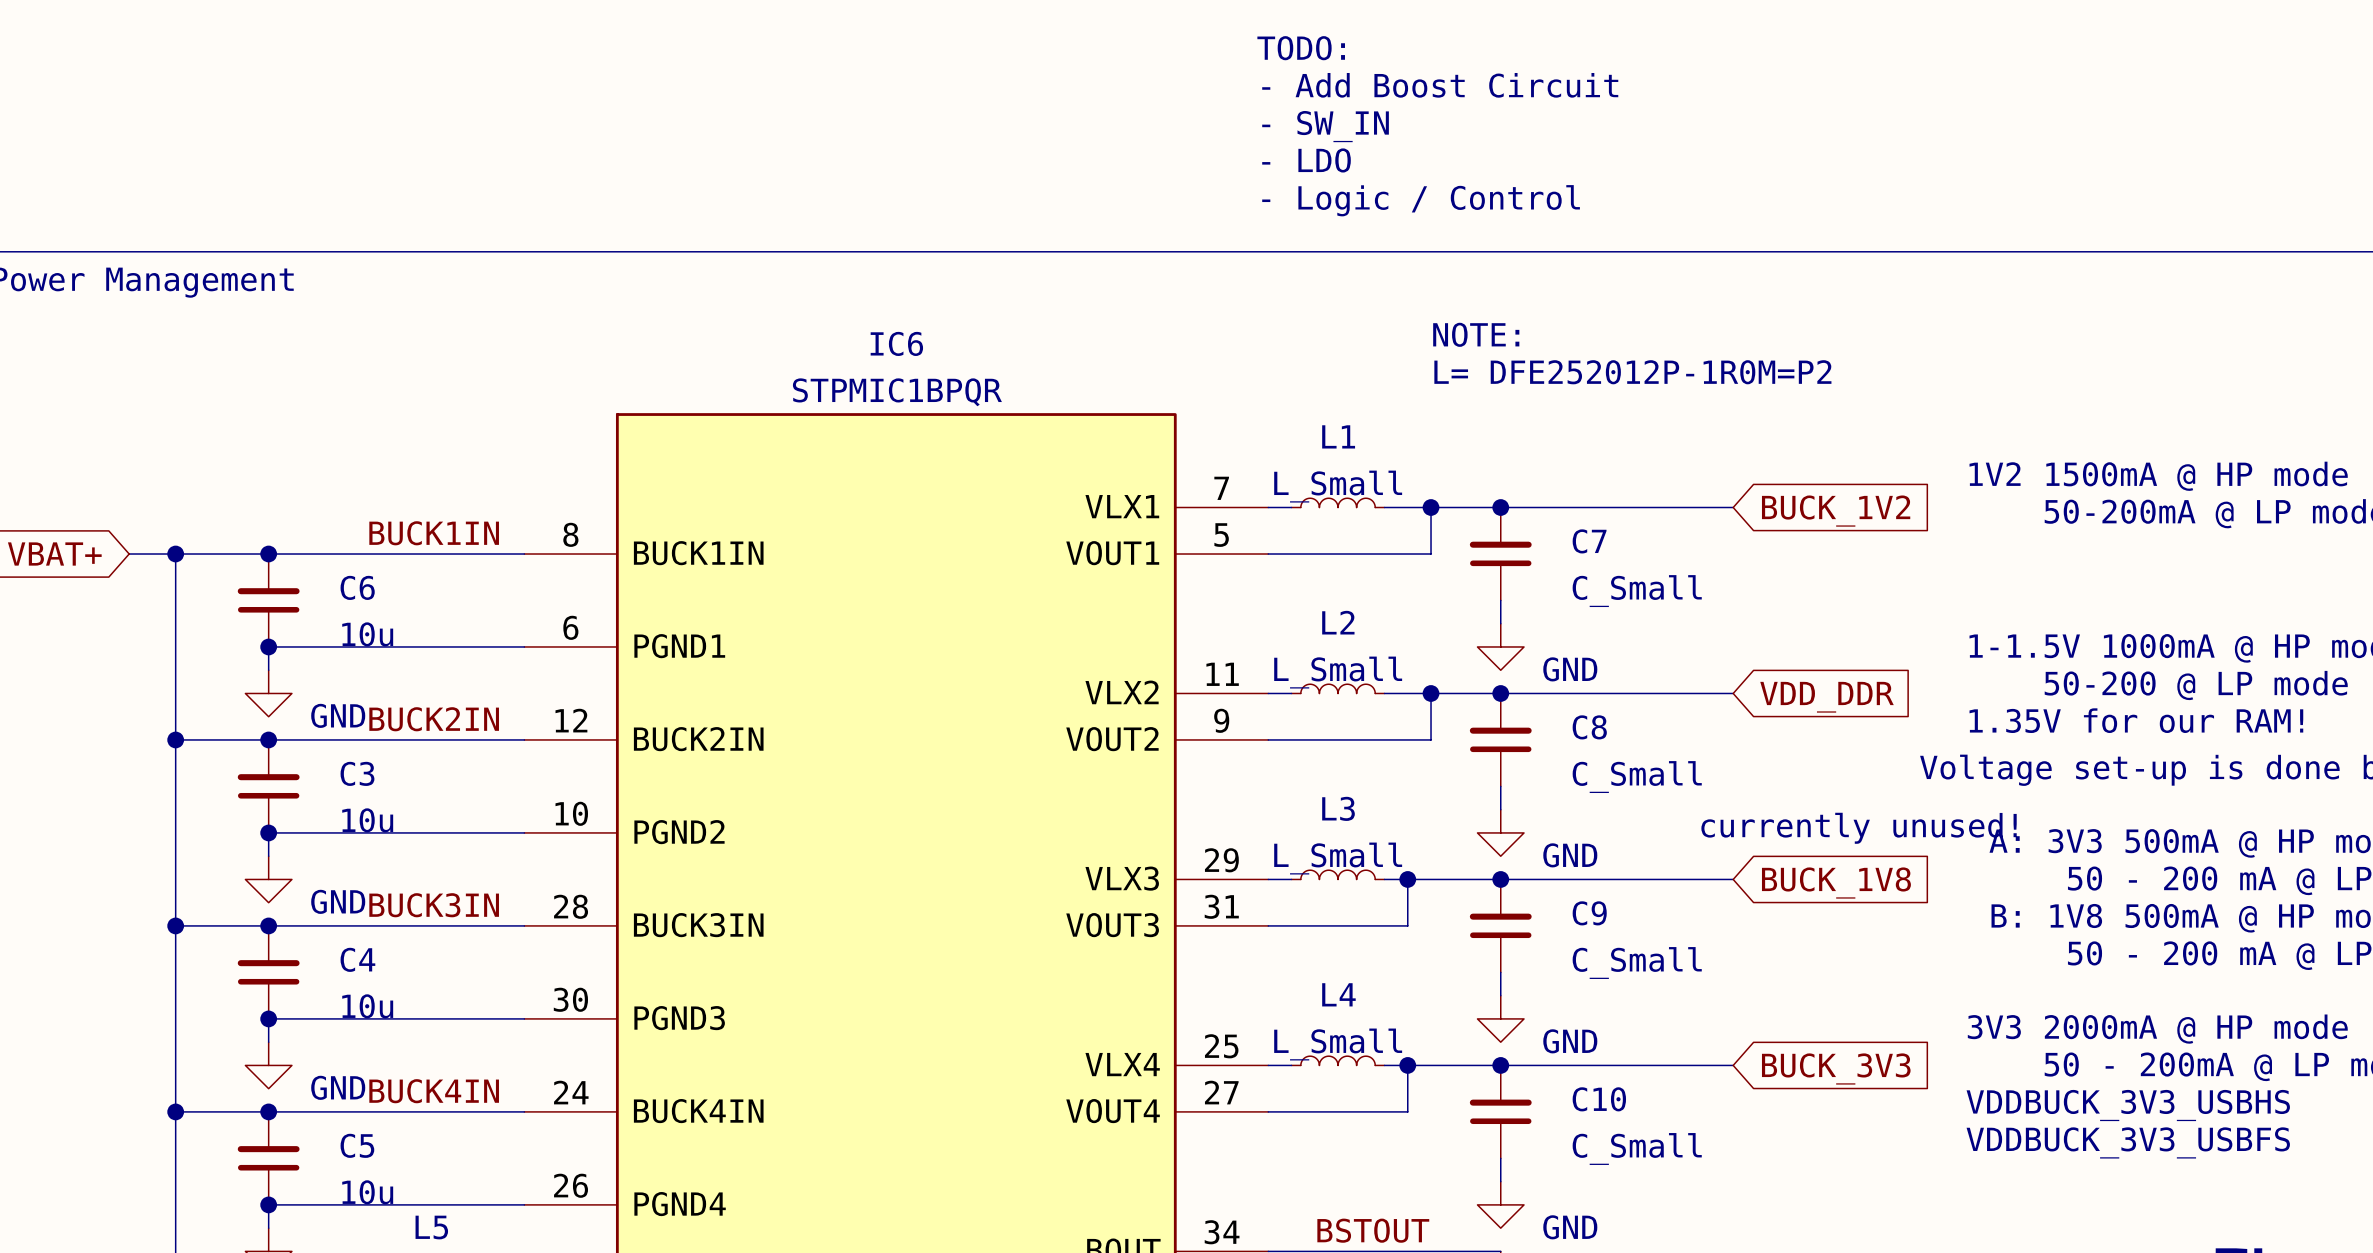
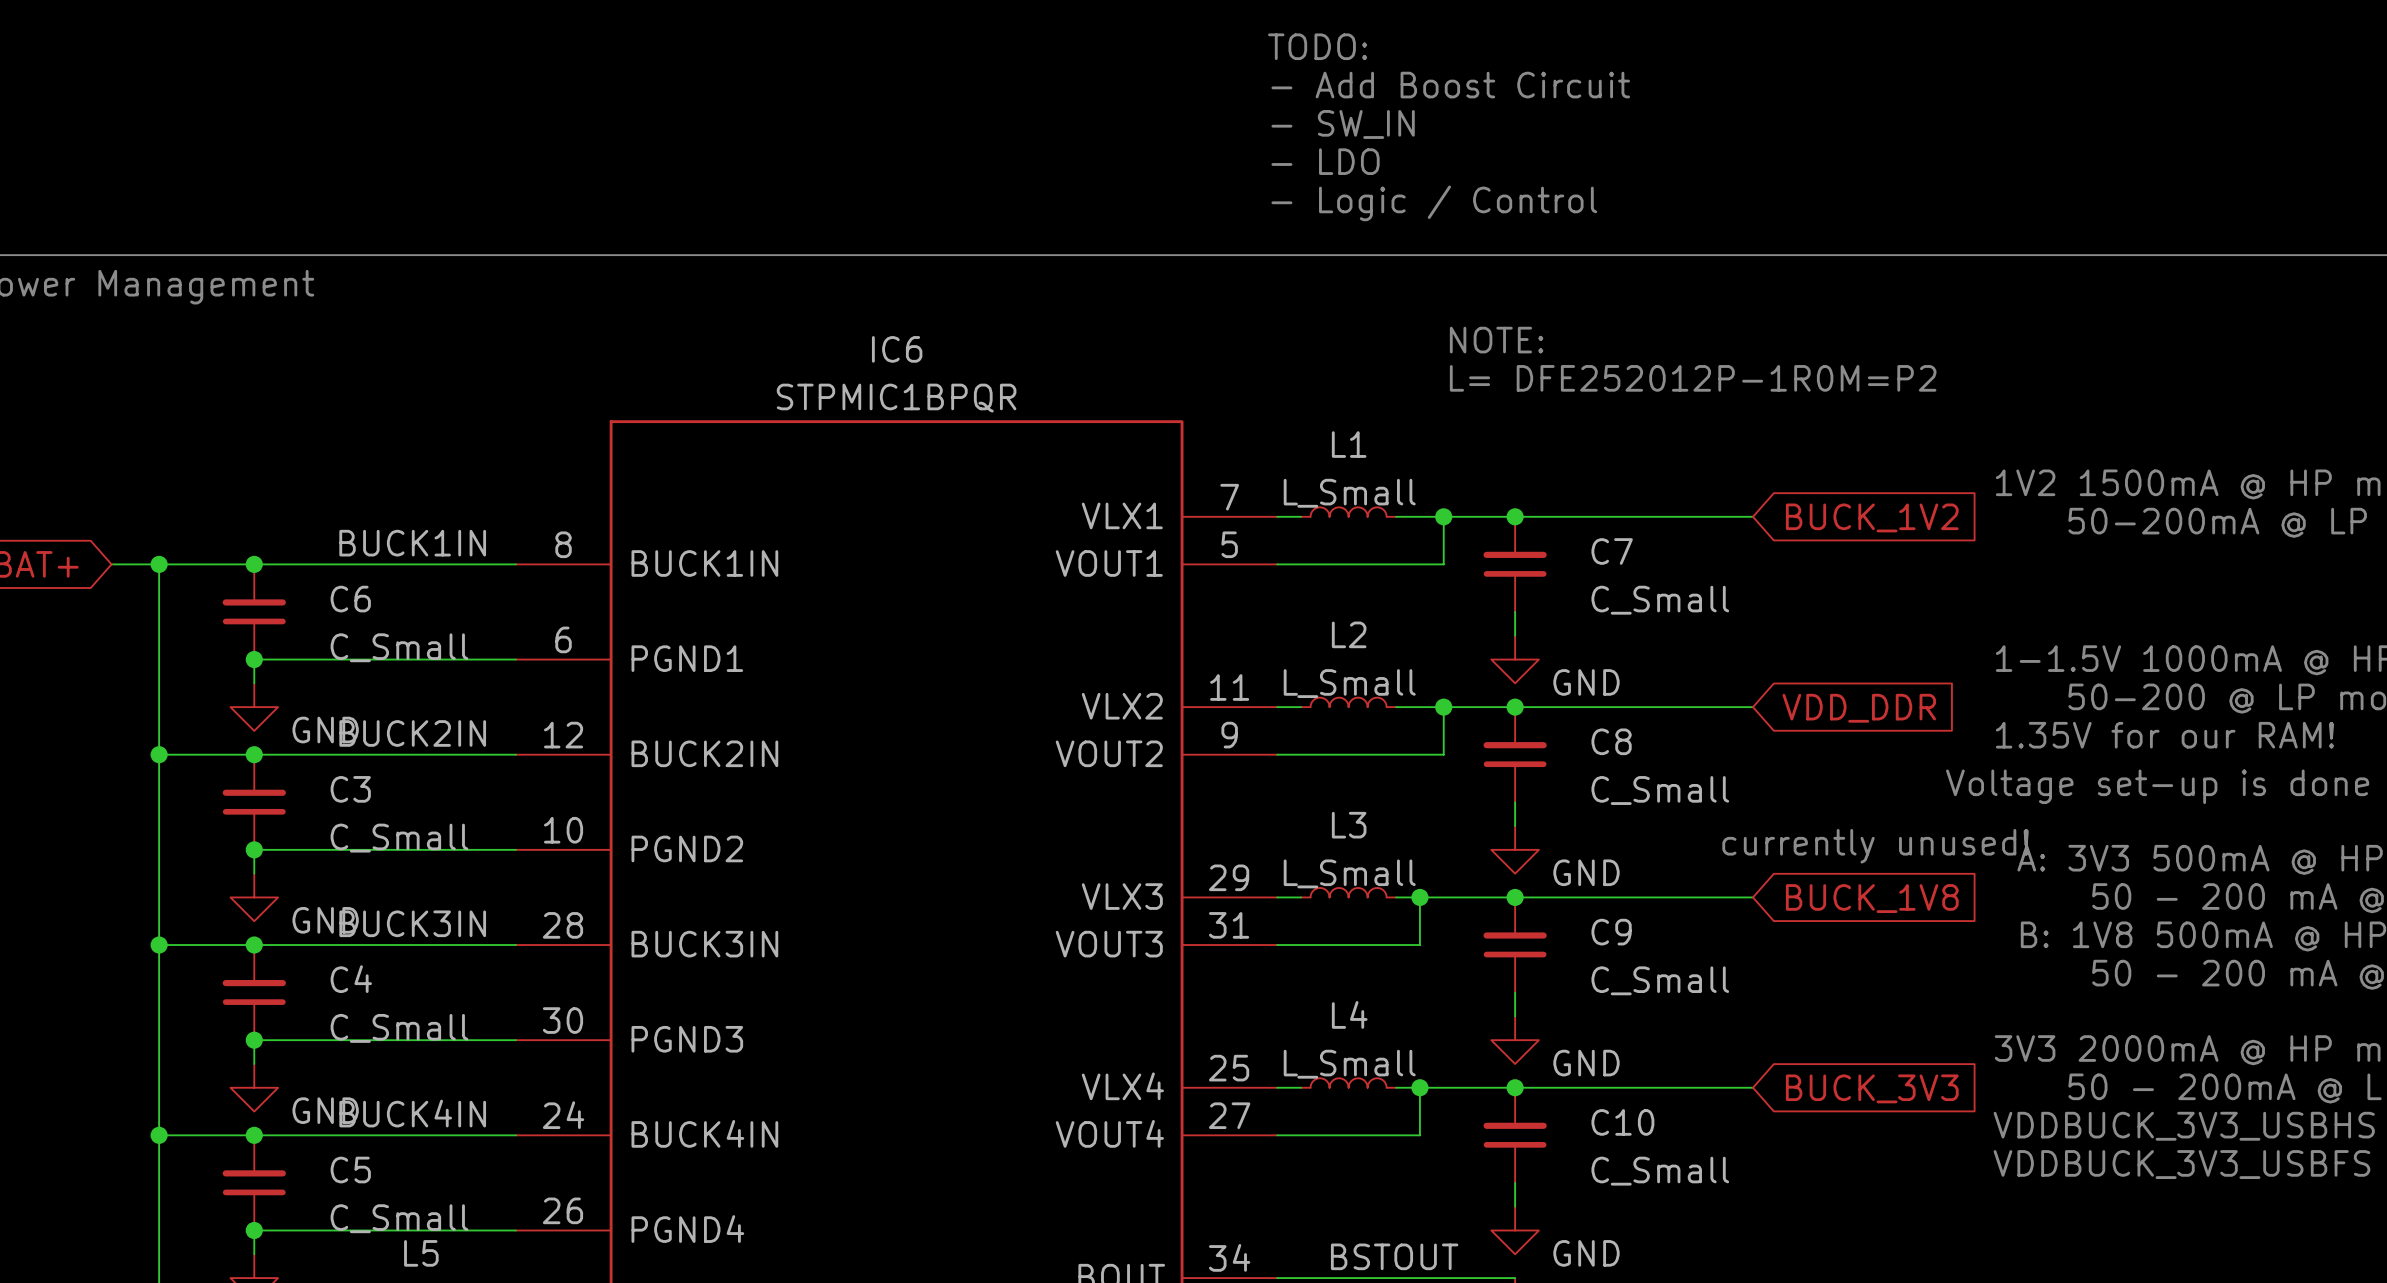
C6 value: 10u (367, 634) -> C_Small (399, 647)
C3 value: 10u (367, 820) -> C_Small (399, 838)
C4 value: 10u (367, 1006) -> C_Small (399, 1028)
C5 value: 10u (367, 1192) -> C_Small (399, 1218)

